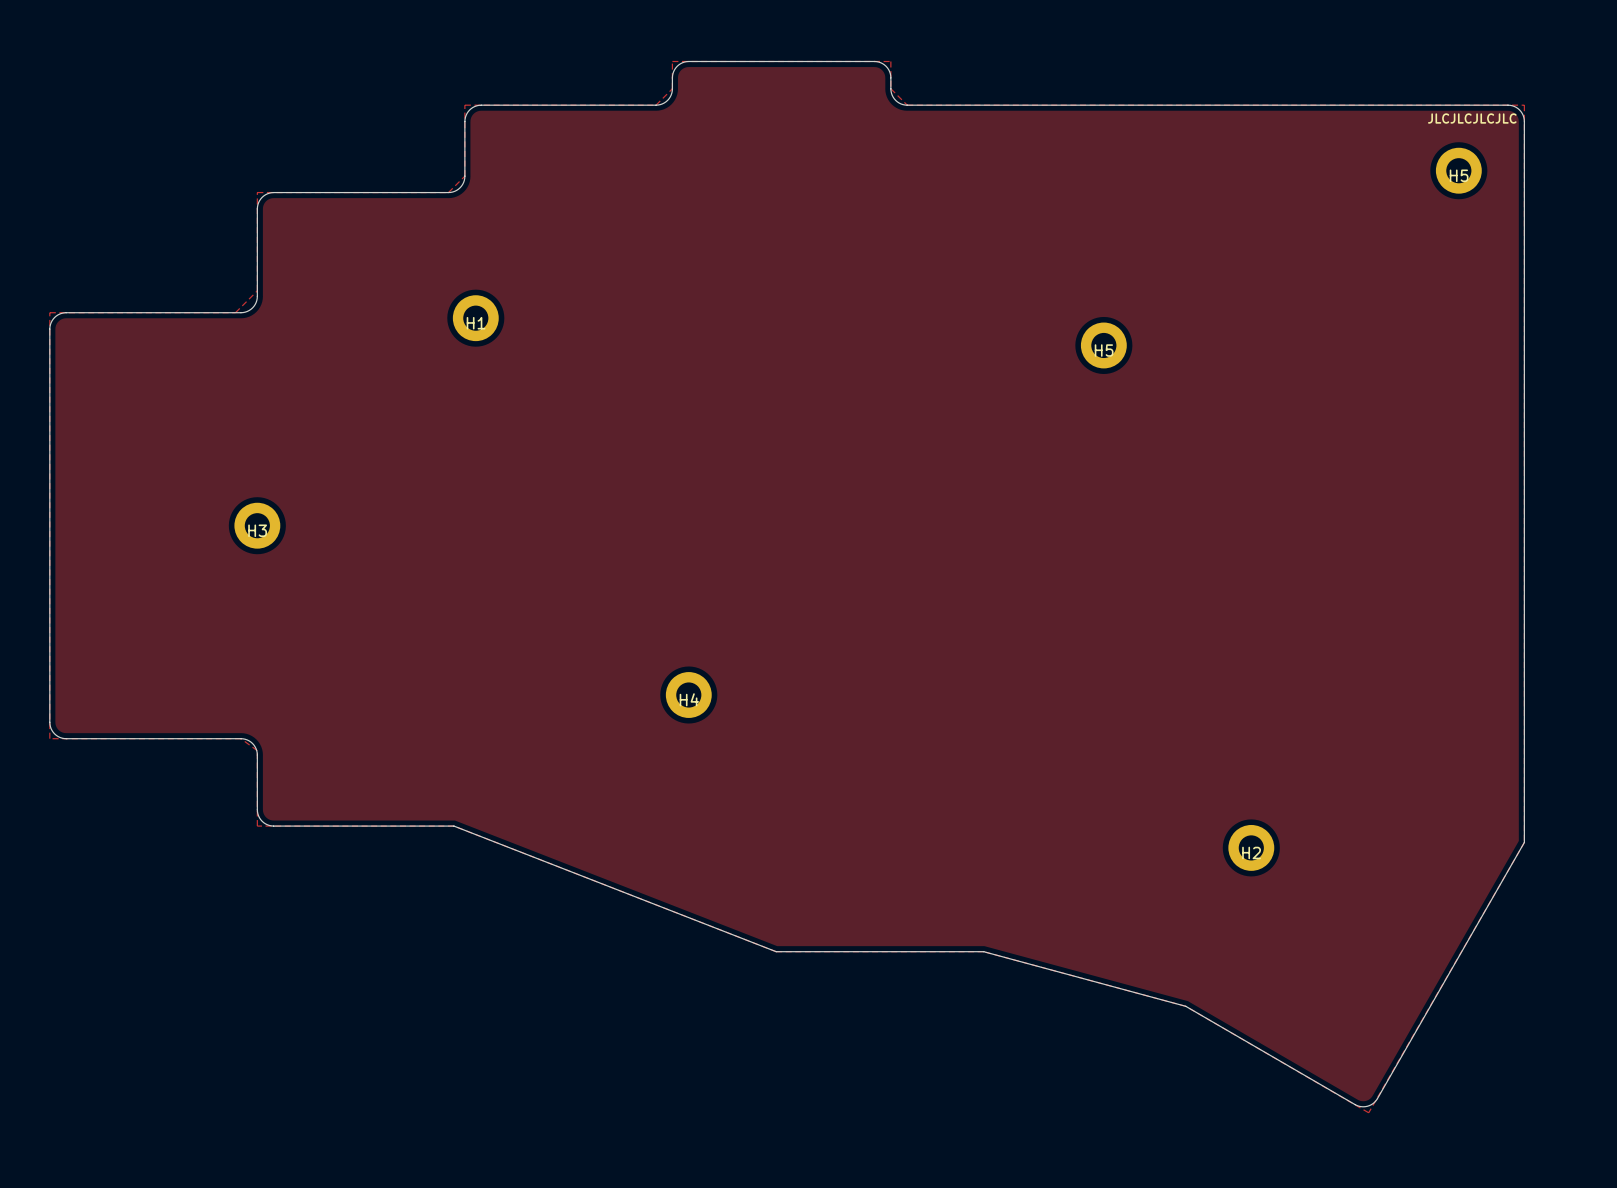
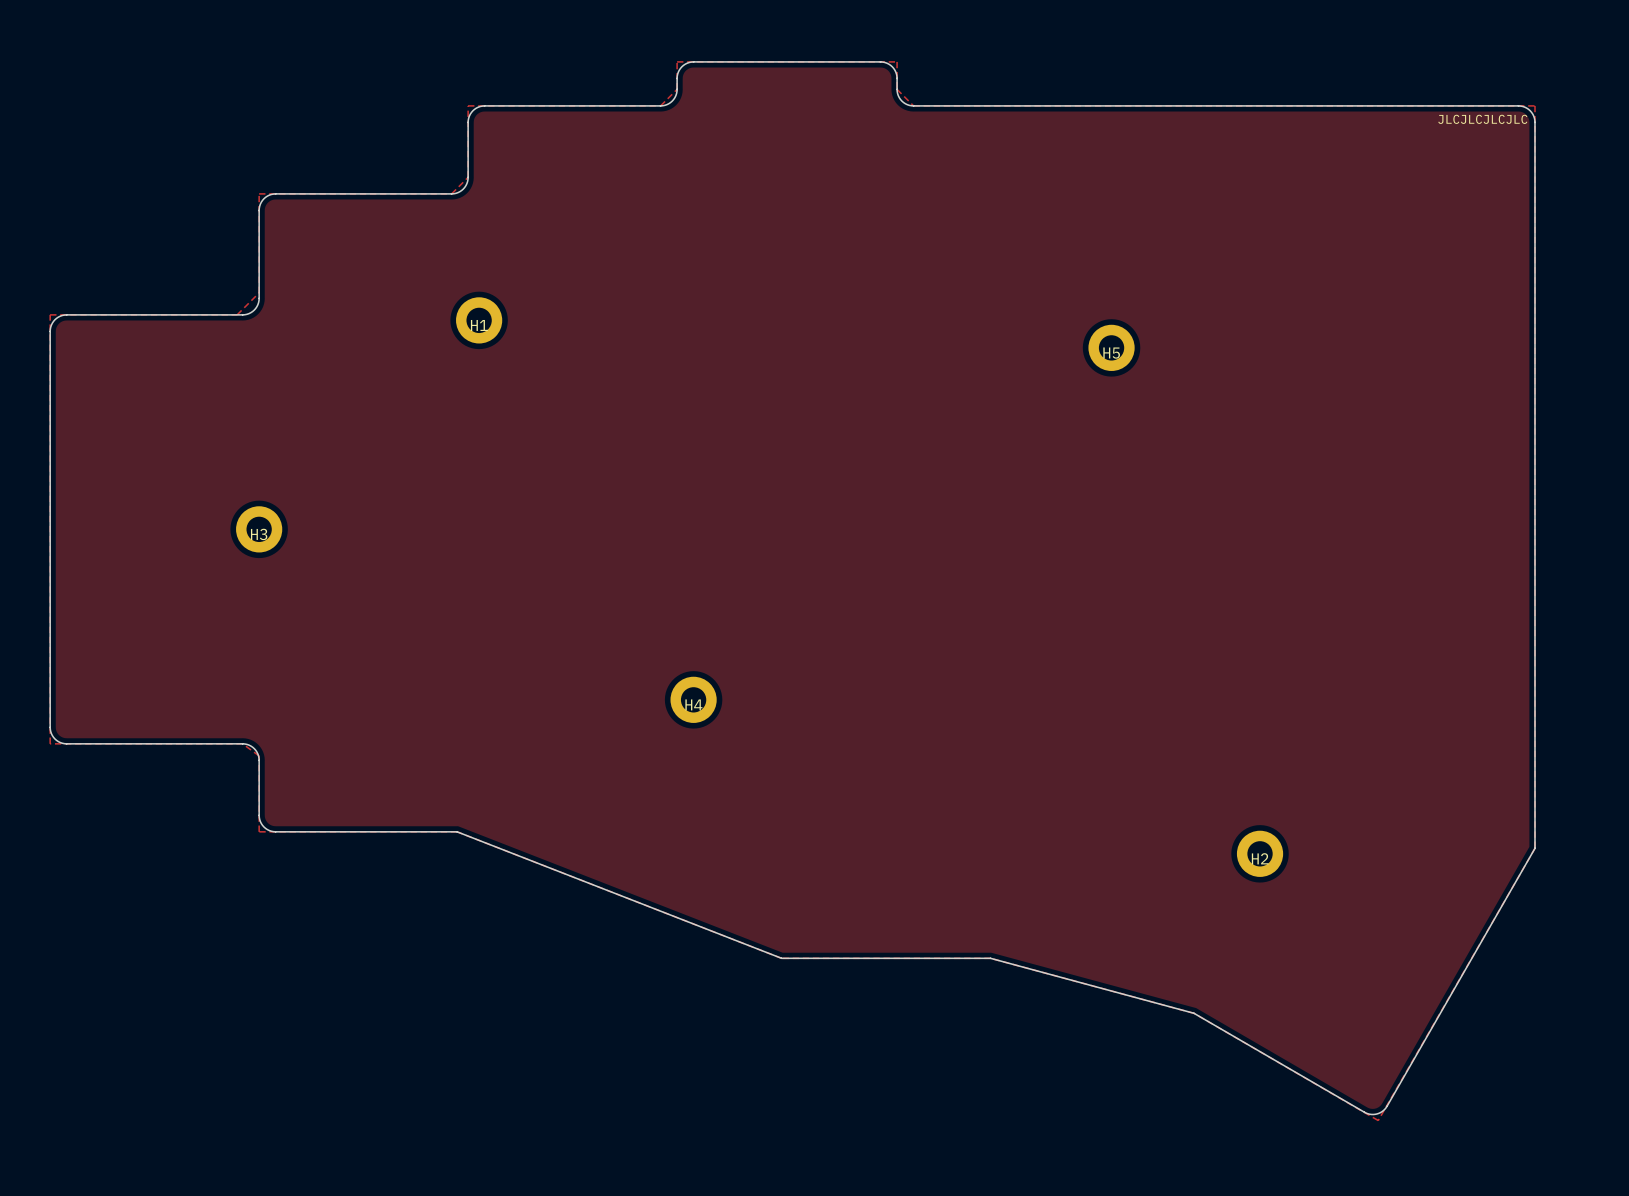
H5: (1458, 170) -> none

